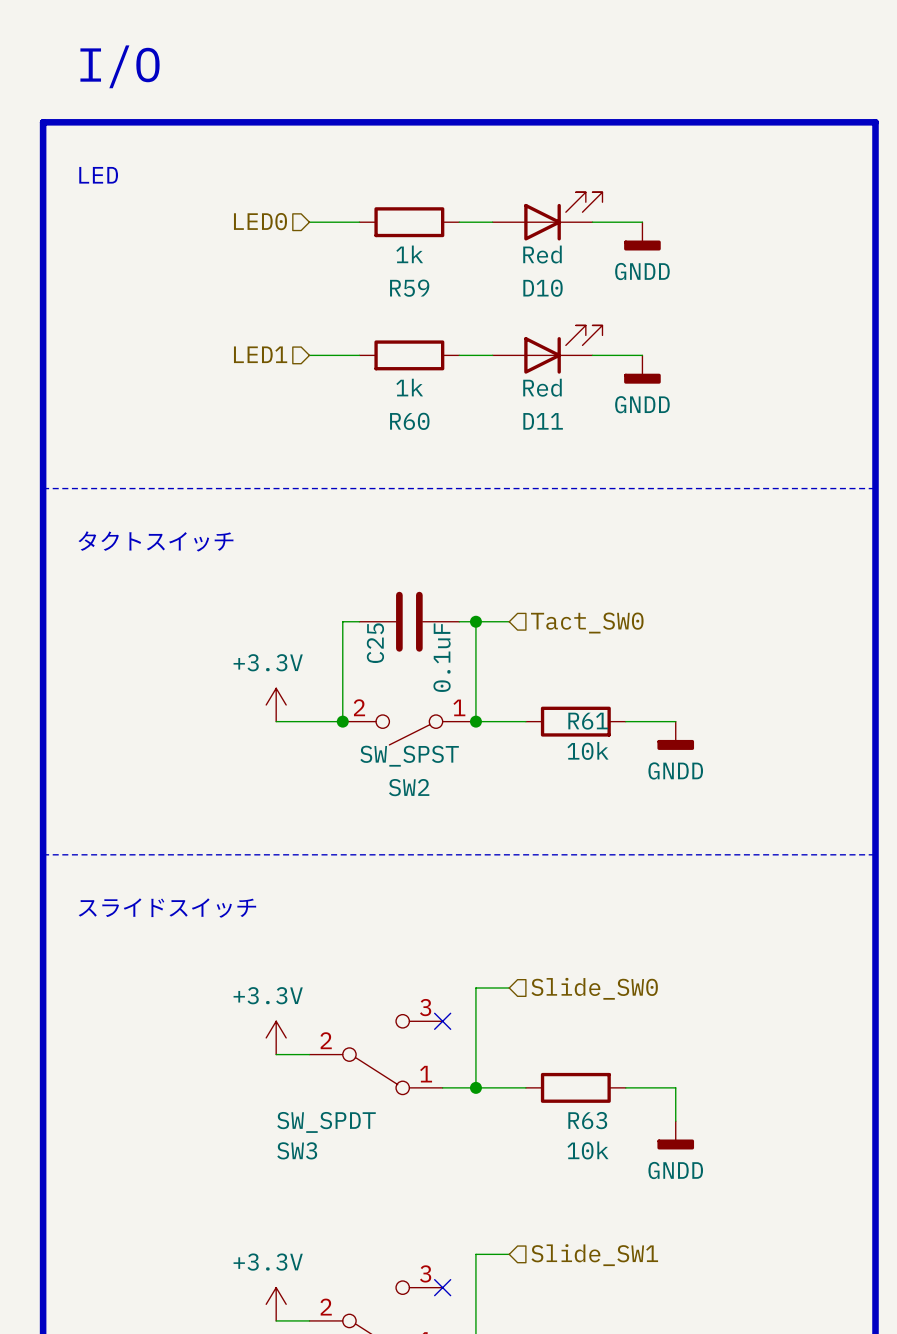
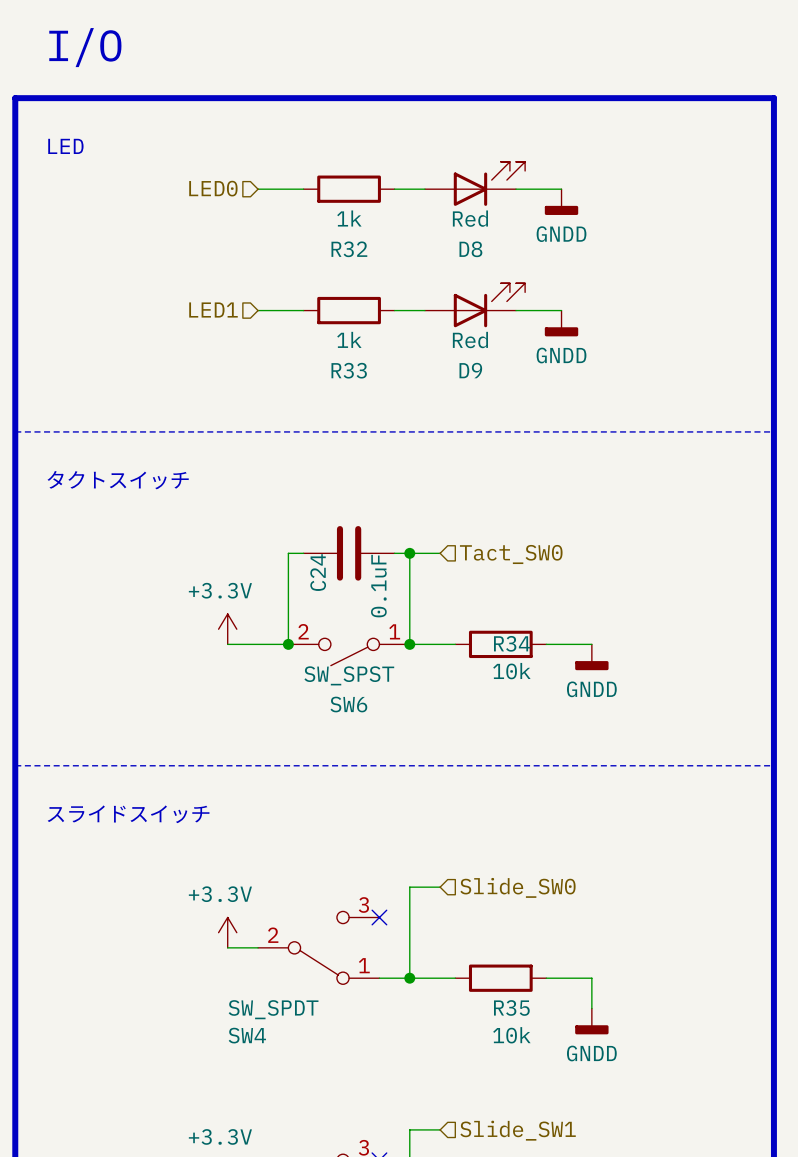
R59 name: R59 (409, 288) -> R32 (349, 249)
D10 name: D10 (543, 288) -> D8 (470, 249)
R60 name: R60 (409, 421) -> R33 (349, 370)
D11 name: D11 (543, 421) -> D9 (470, 370)
C25 name: C25 (375, 643) -> C24 (318, 572)
R61 name: R61 (588, 721) -> R34 (512, 643)
SW2 name: SW2 (409, 787) -> SW6 (348, 704)
R63 name: R63 (587, 1120) -> R35 (511, 1007)
SW3 name: SW3 (297, 1150) -> SW4 (247, 1035)

